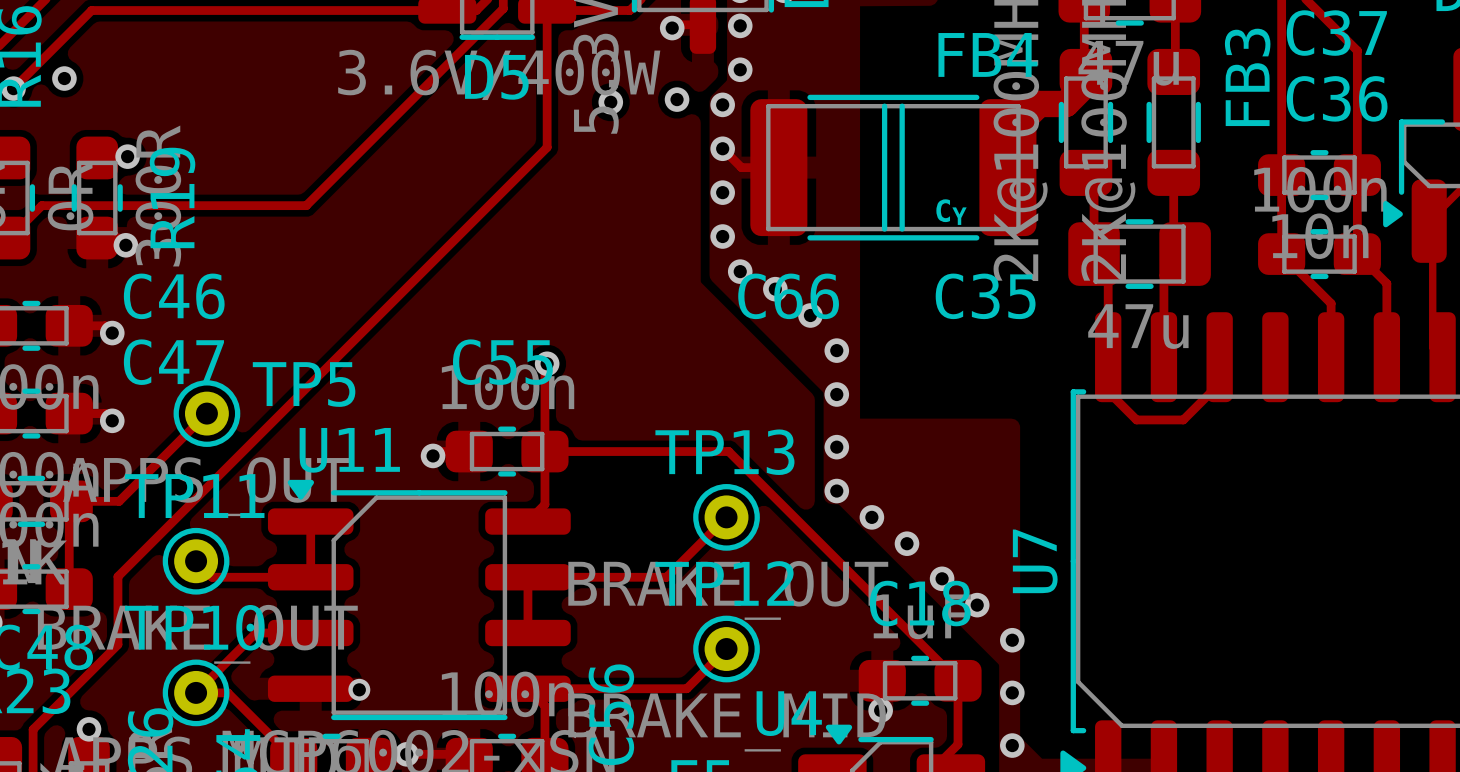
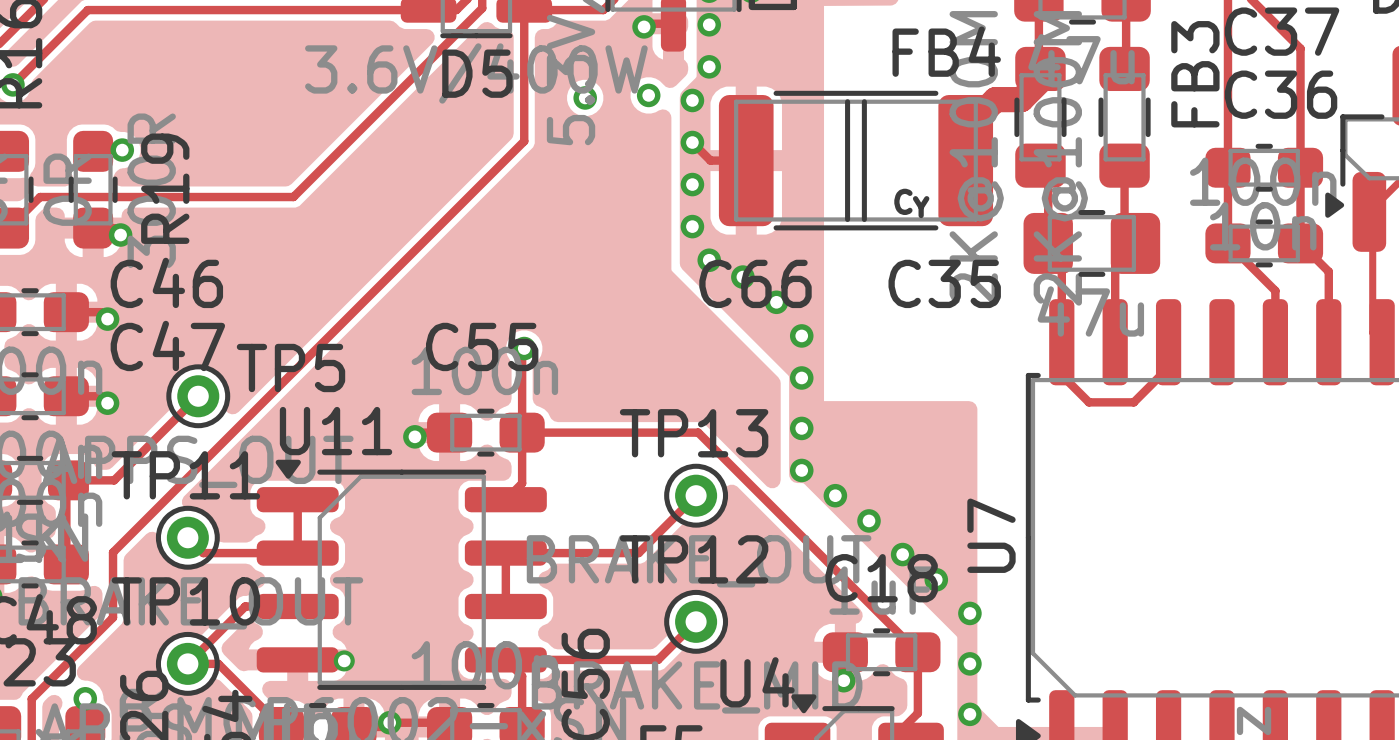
via: (64, 78) -> none

